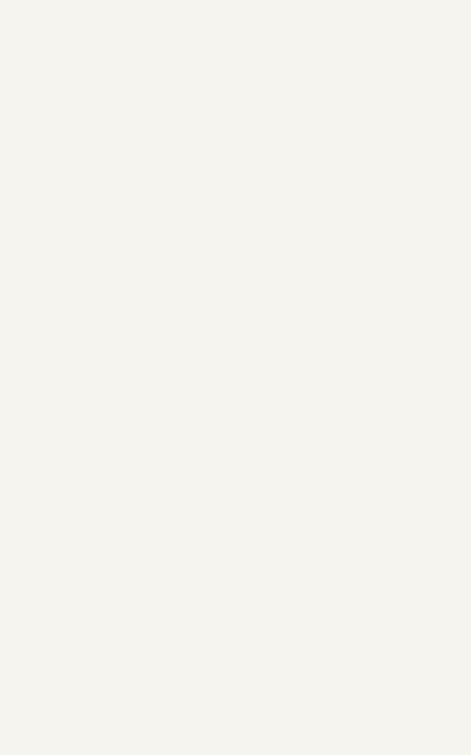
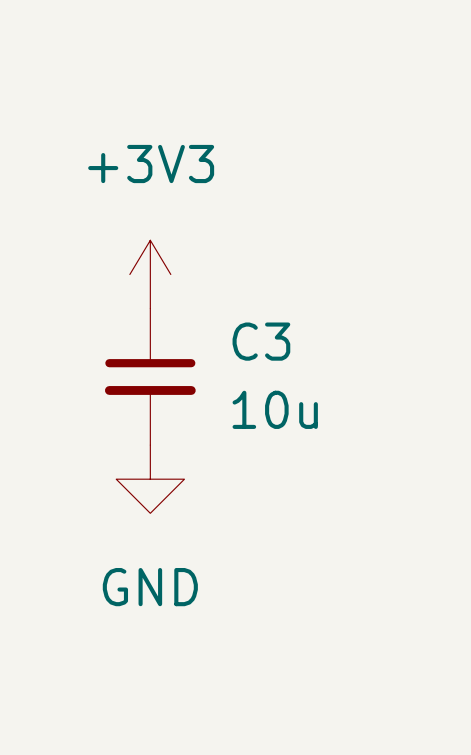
power symbol: none -> +3V3 (150, 274)
C3: none -> 10u (150, 376)
power symbol: none -> GND (150, 479)

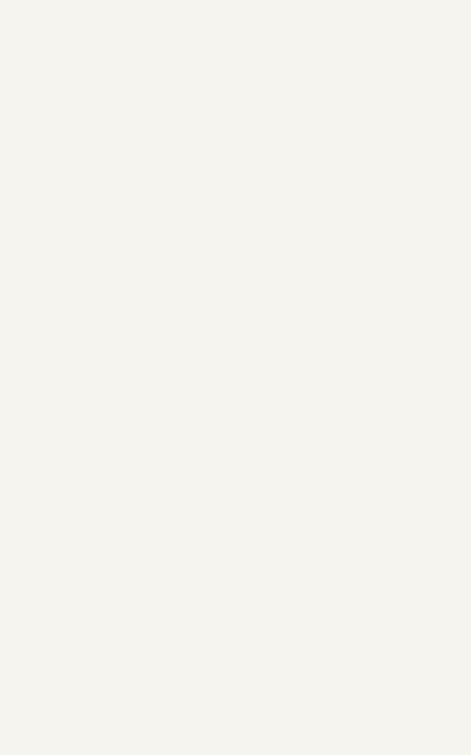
power symbol: +3V3 (150, 274) -> none
C3: 10u (150, 376) -> none
power symbol: GND (150, 479) -> none

